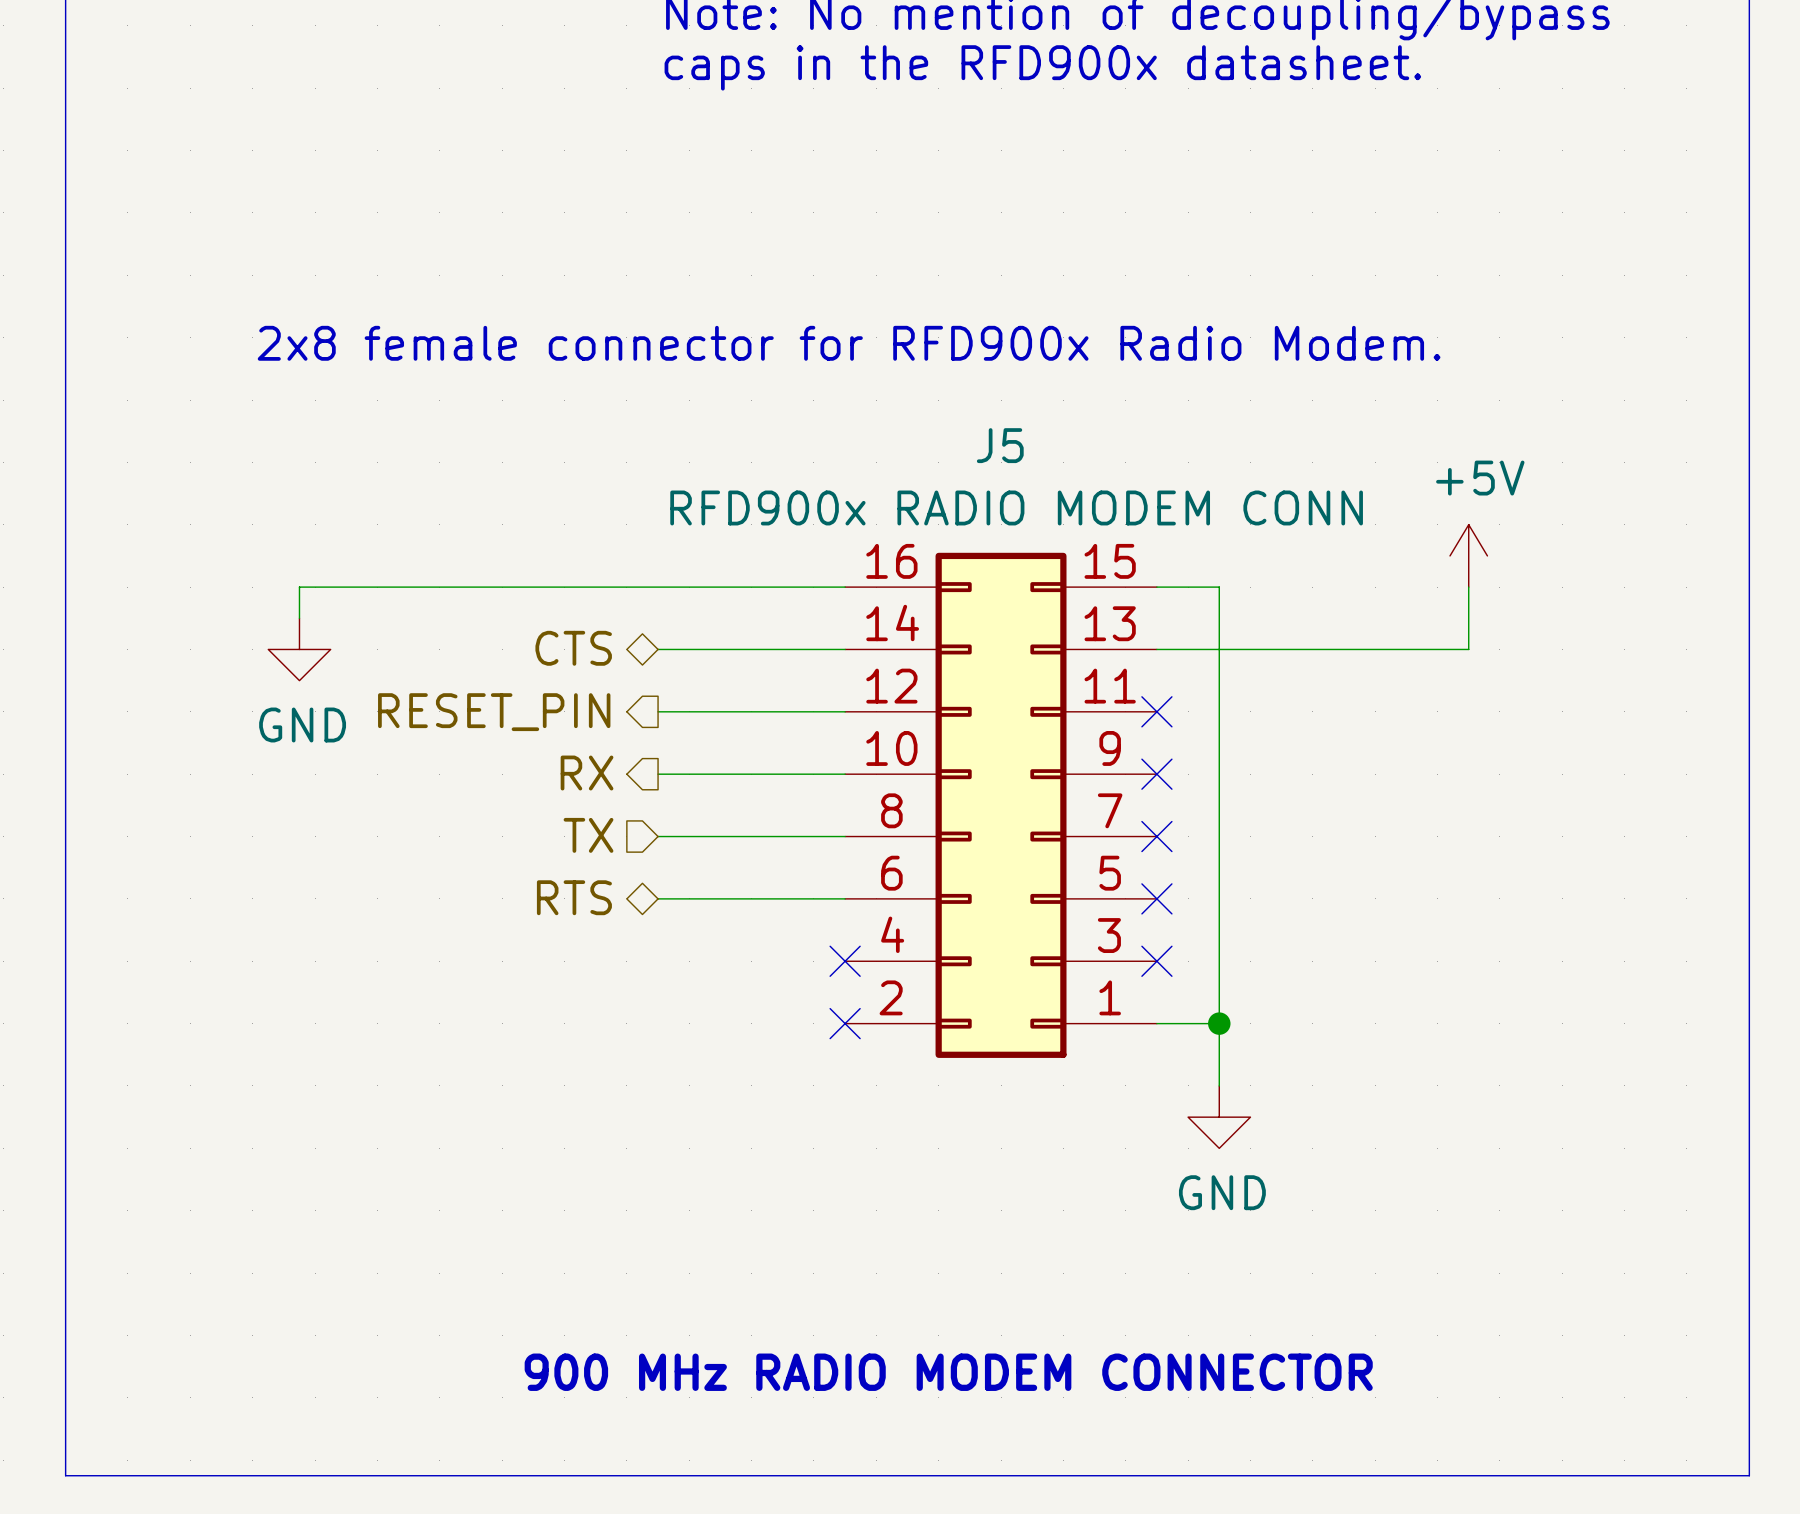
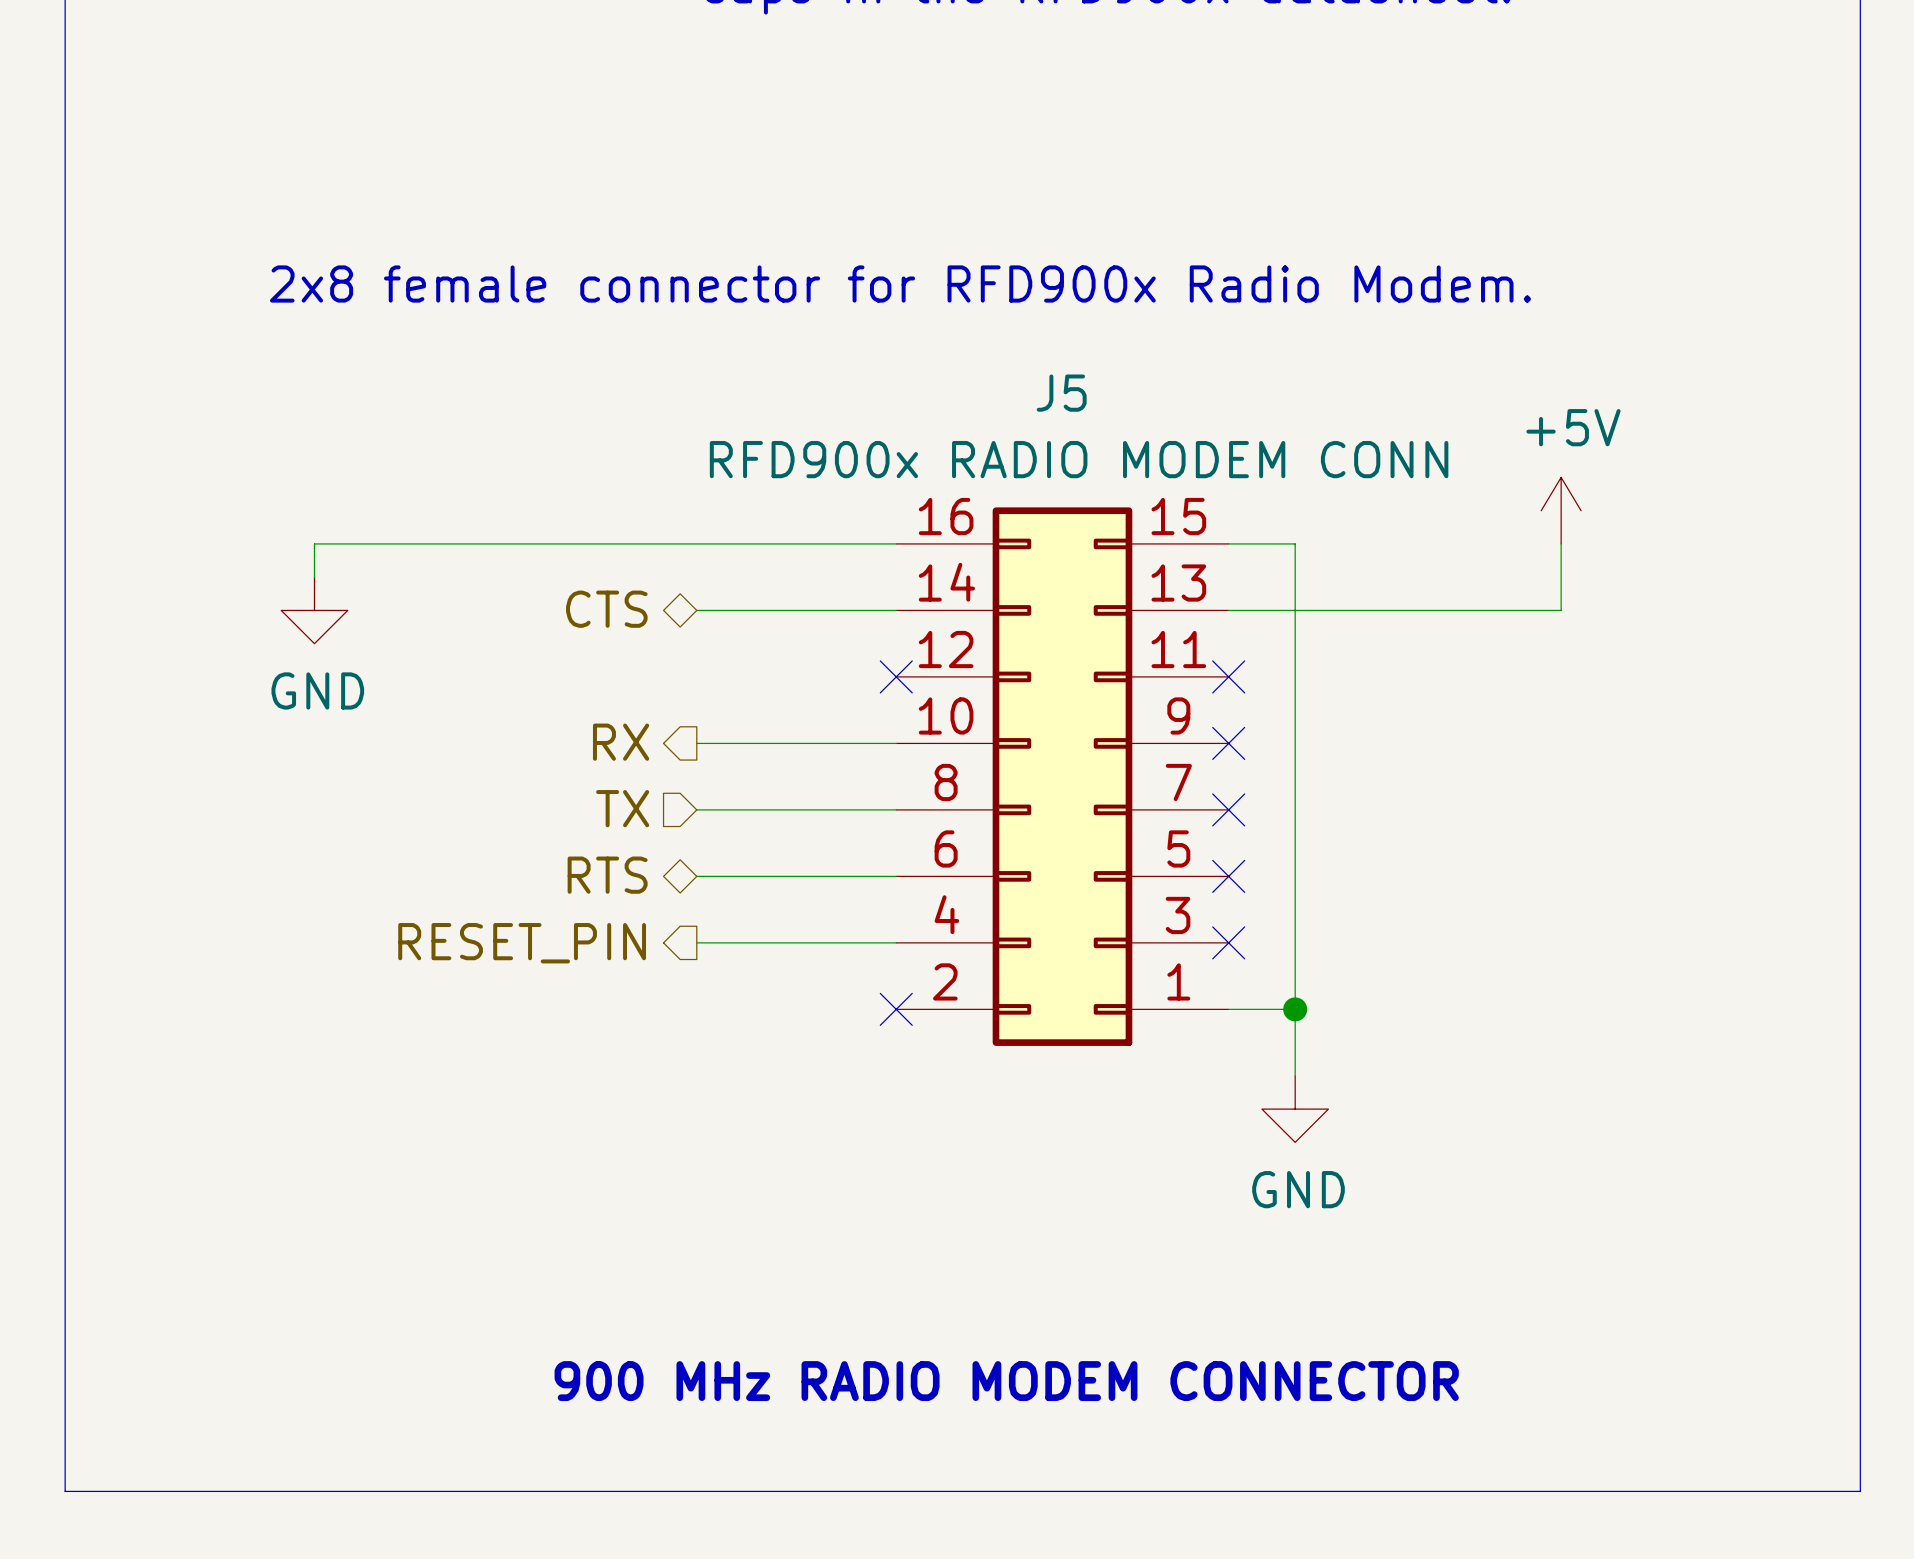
wire: (658, 711) (845, 711) -> (696, 942) (896, 942)
no-connect mark: none -> (896, 676)
hierarchical label position: RESET_PIN (494, 712) -> RESET_PIN (522, 943)
no-connect mark: (845, 961) -> none

